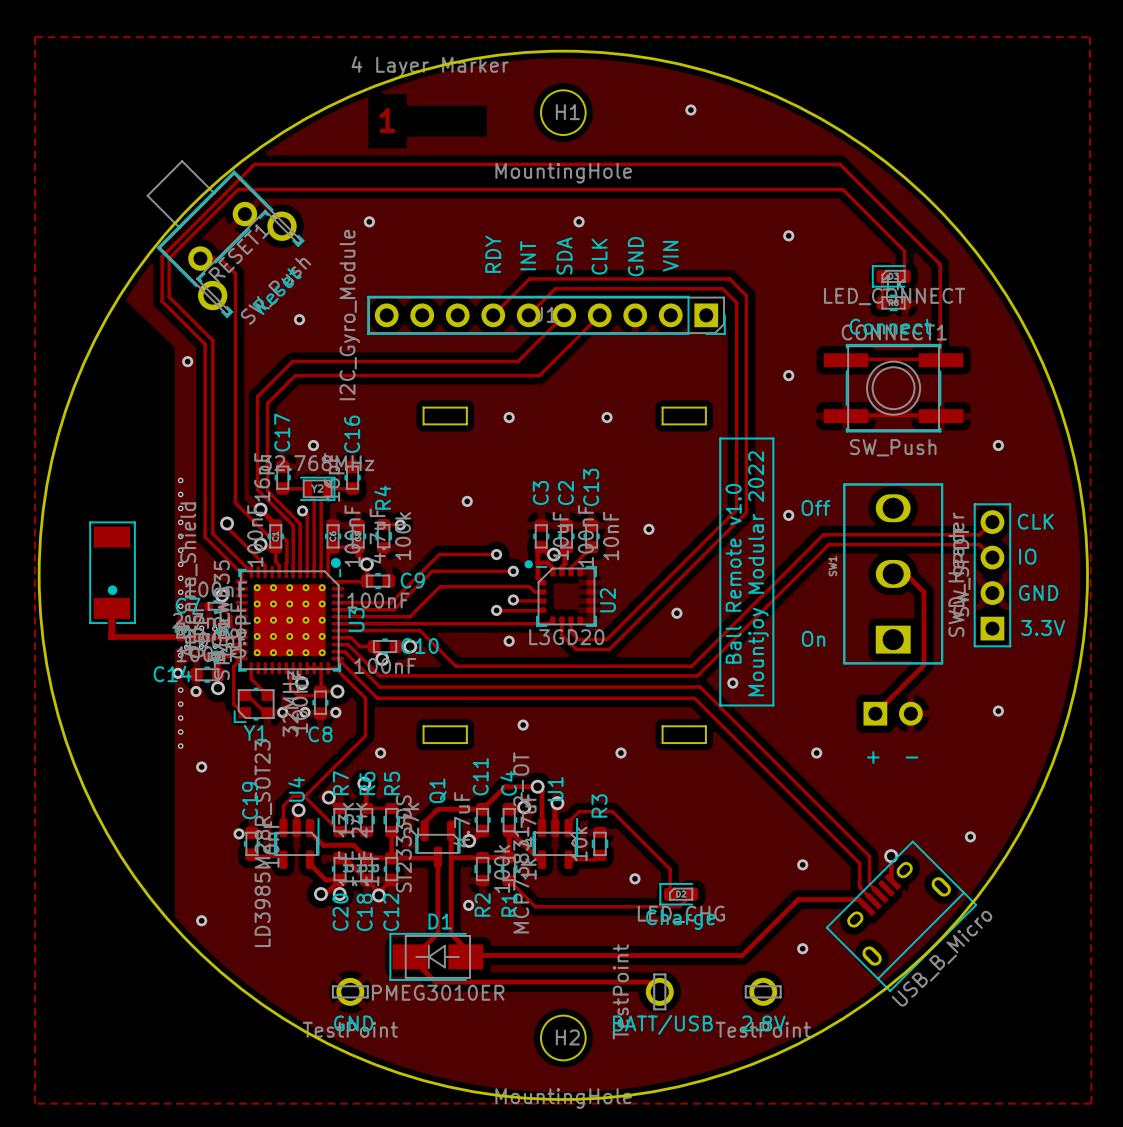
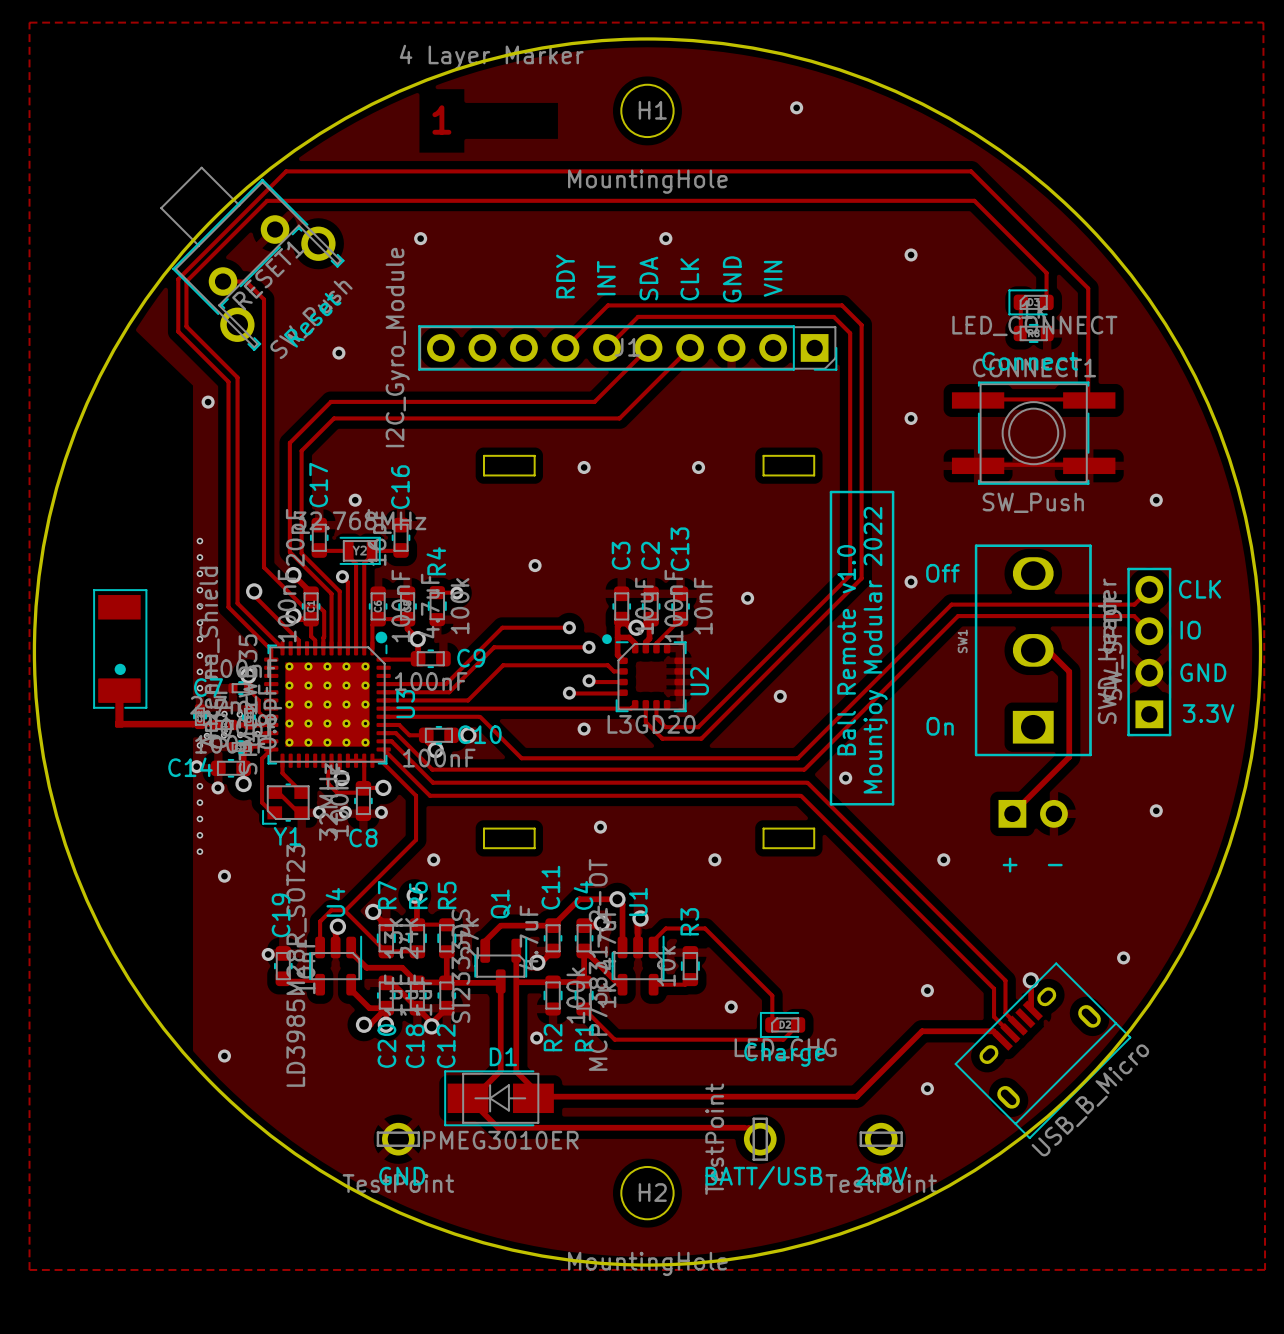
C17 value: 16pF (264, 477) -> 20pF (298, 537)

